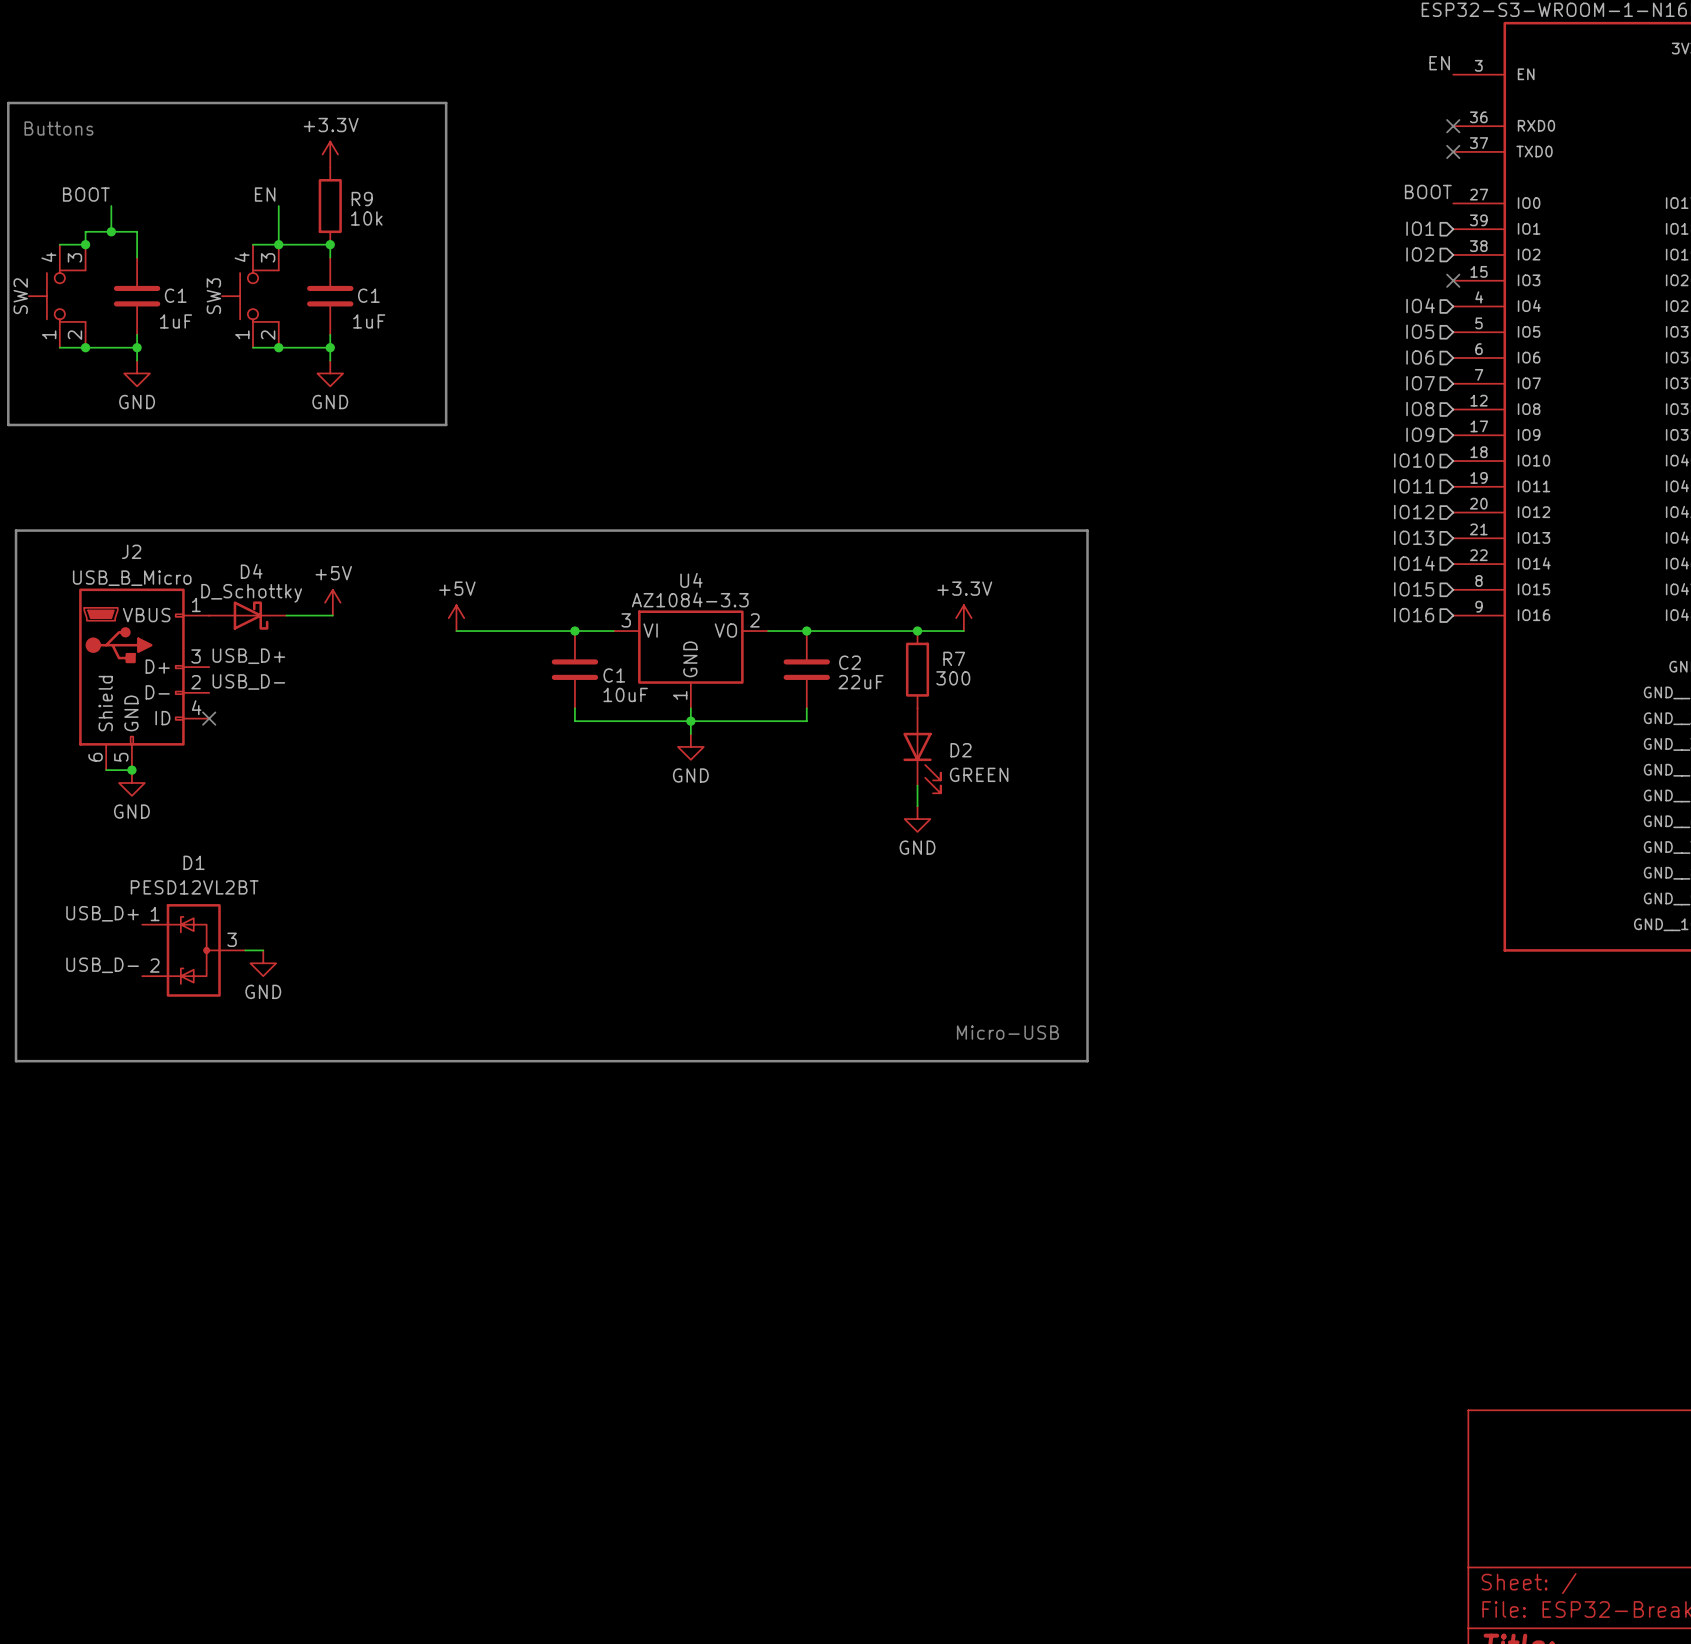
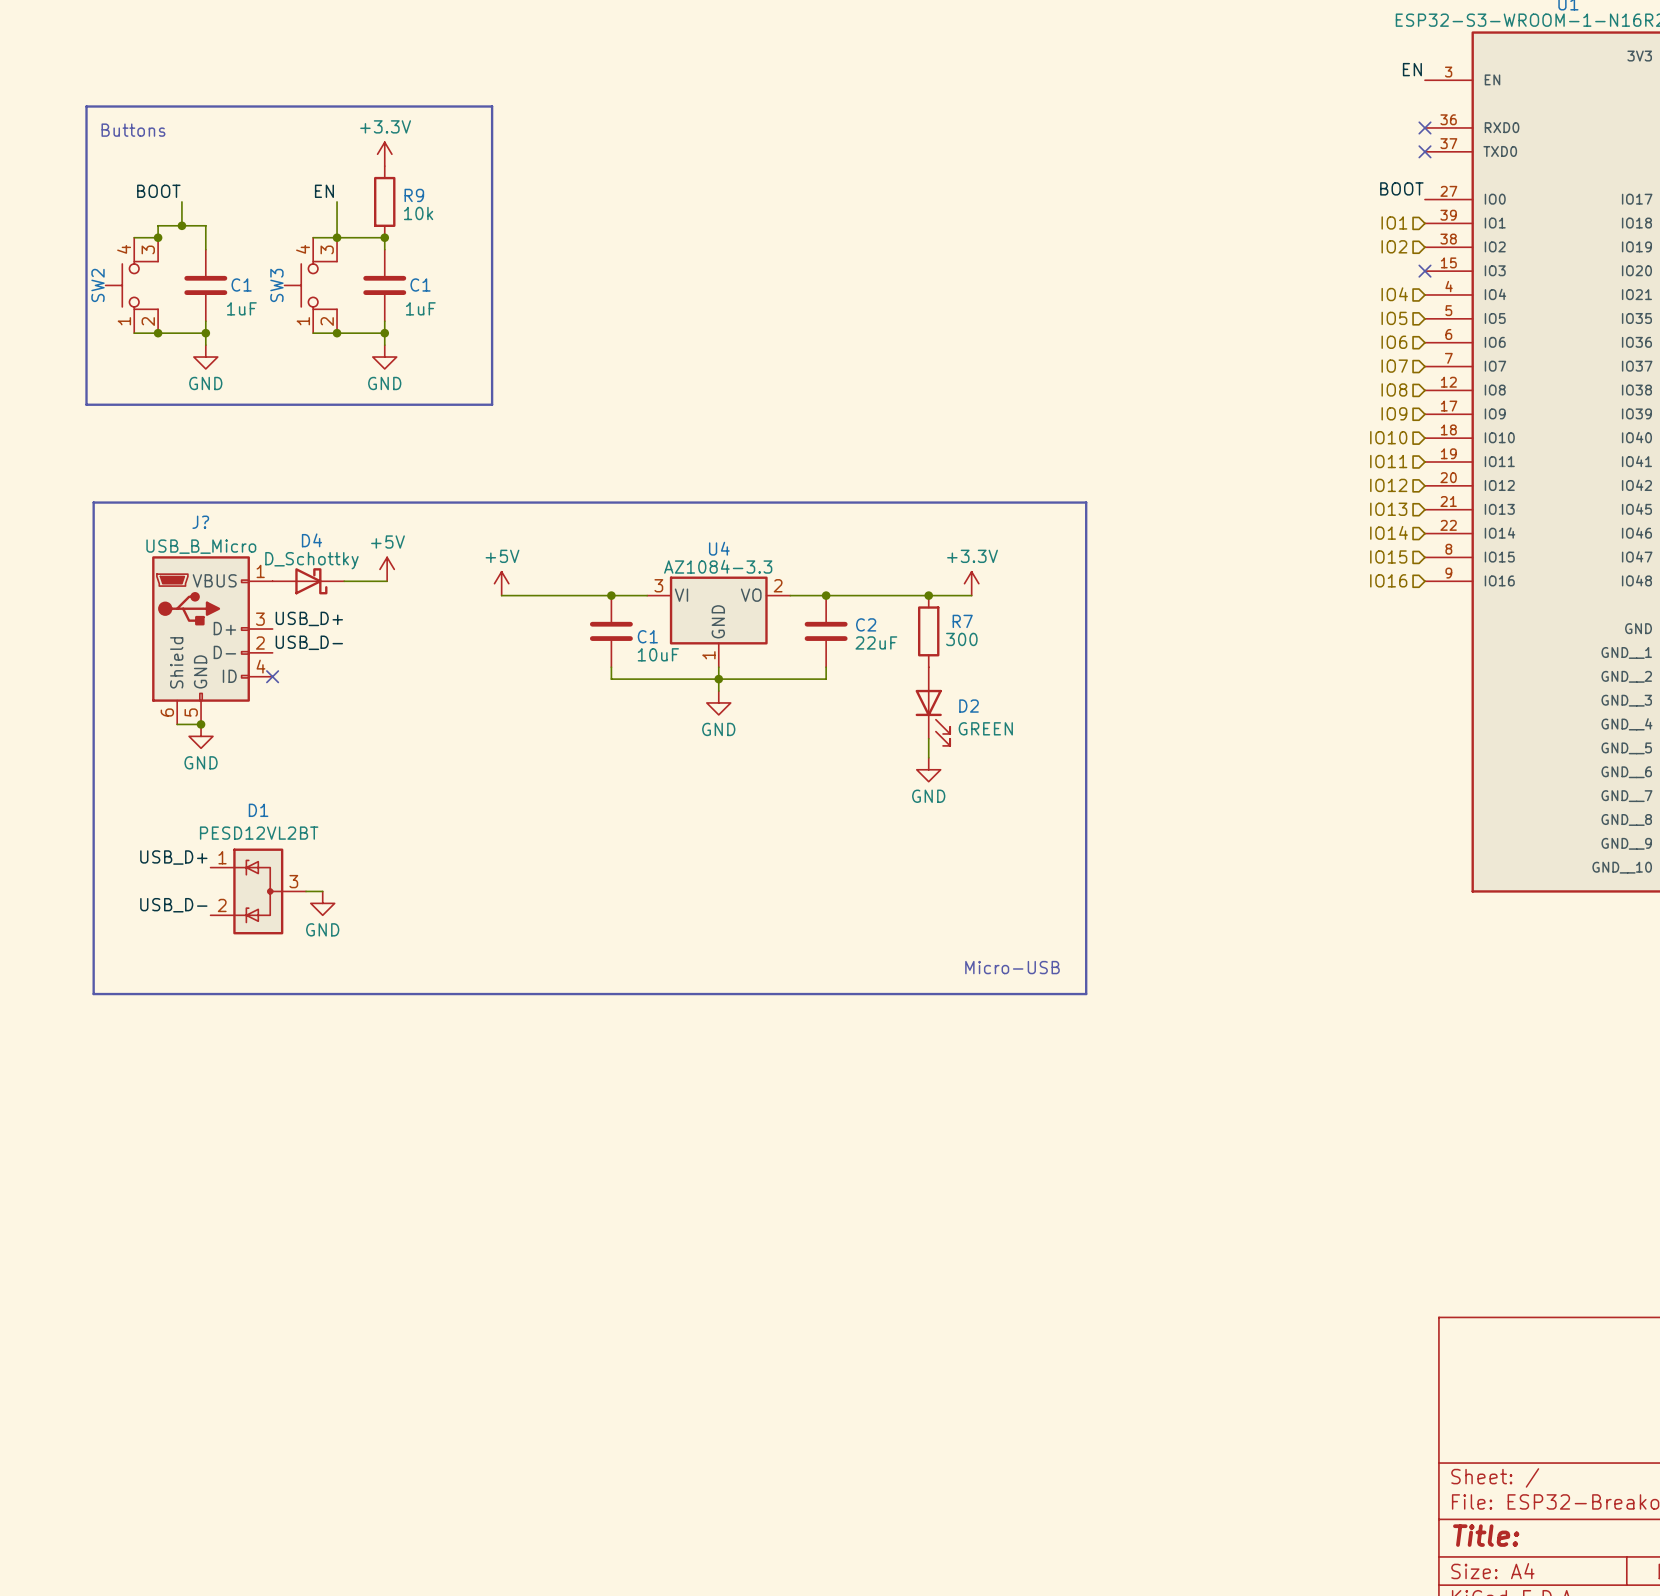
J2 name: J2 (131, 551) -> J? (200, 522)

